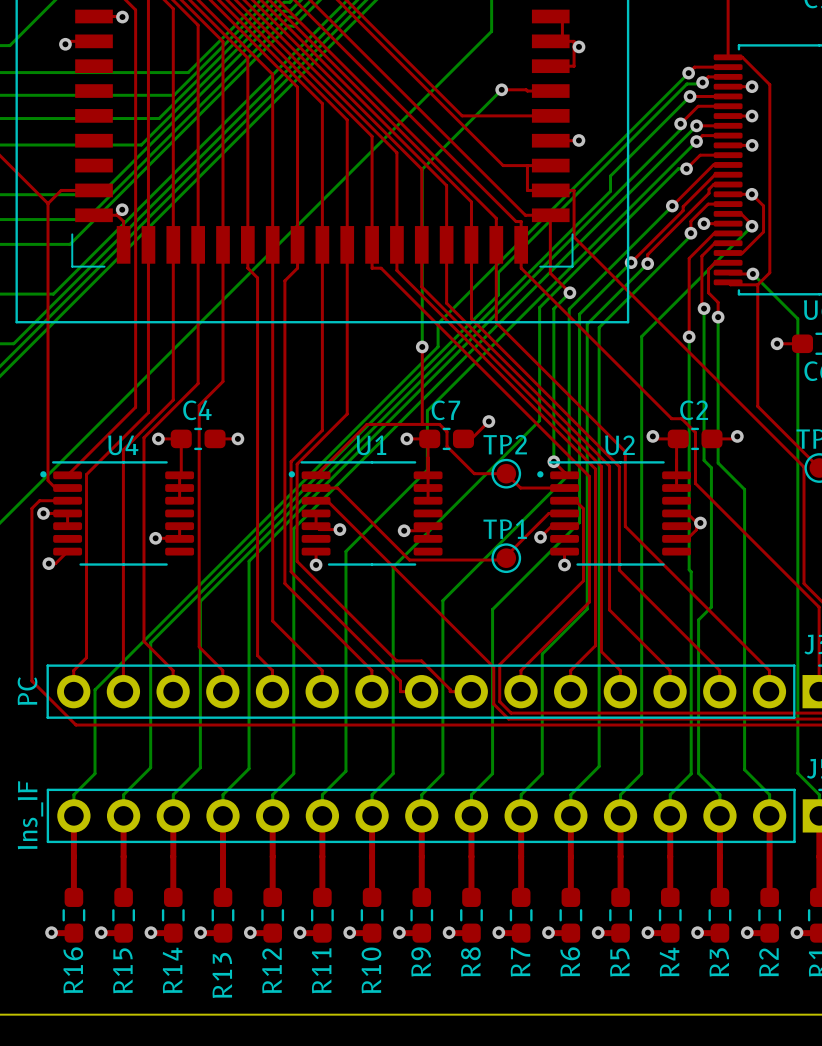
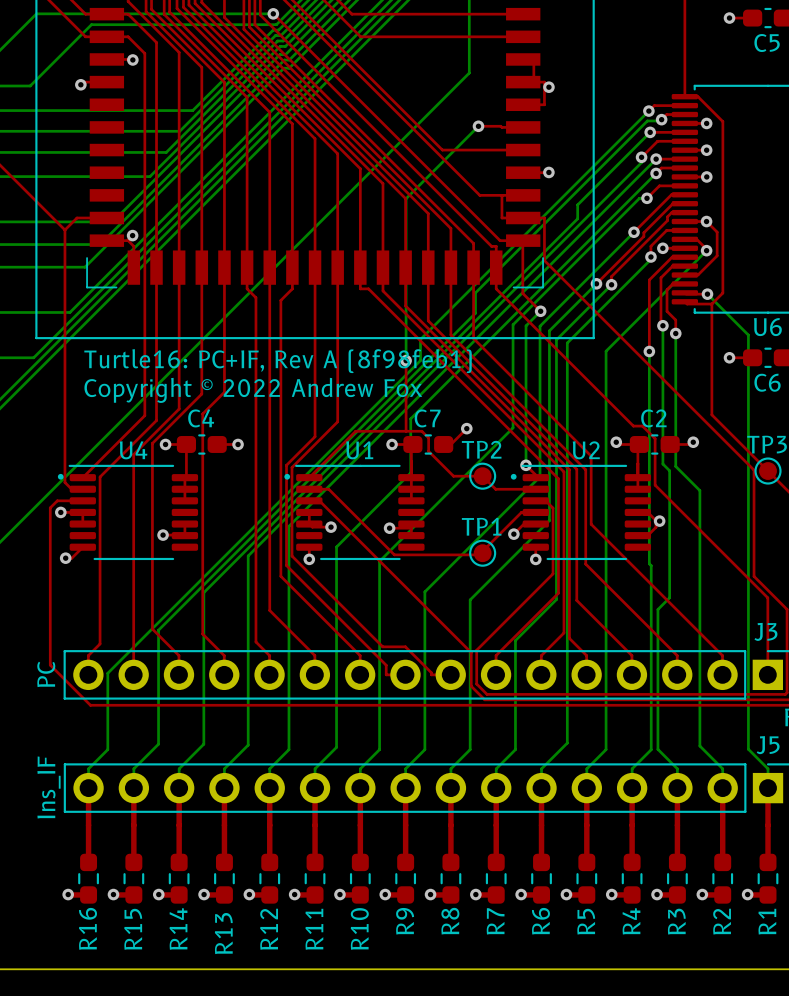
text: none -> Turtle16: PC+IF, Rev A (8f98feb1) (278, 361)
text: none -> Copyright © 2022 Andrew Fox (253, 390)

